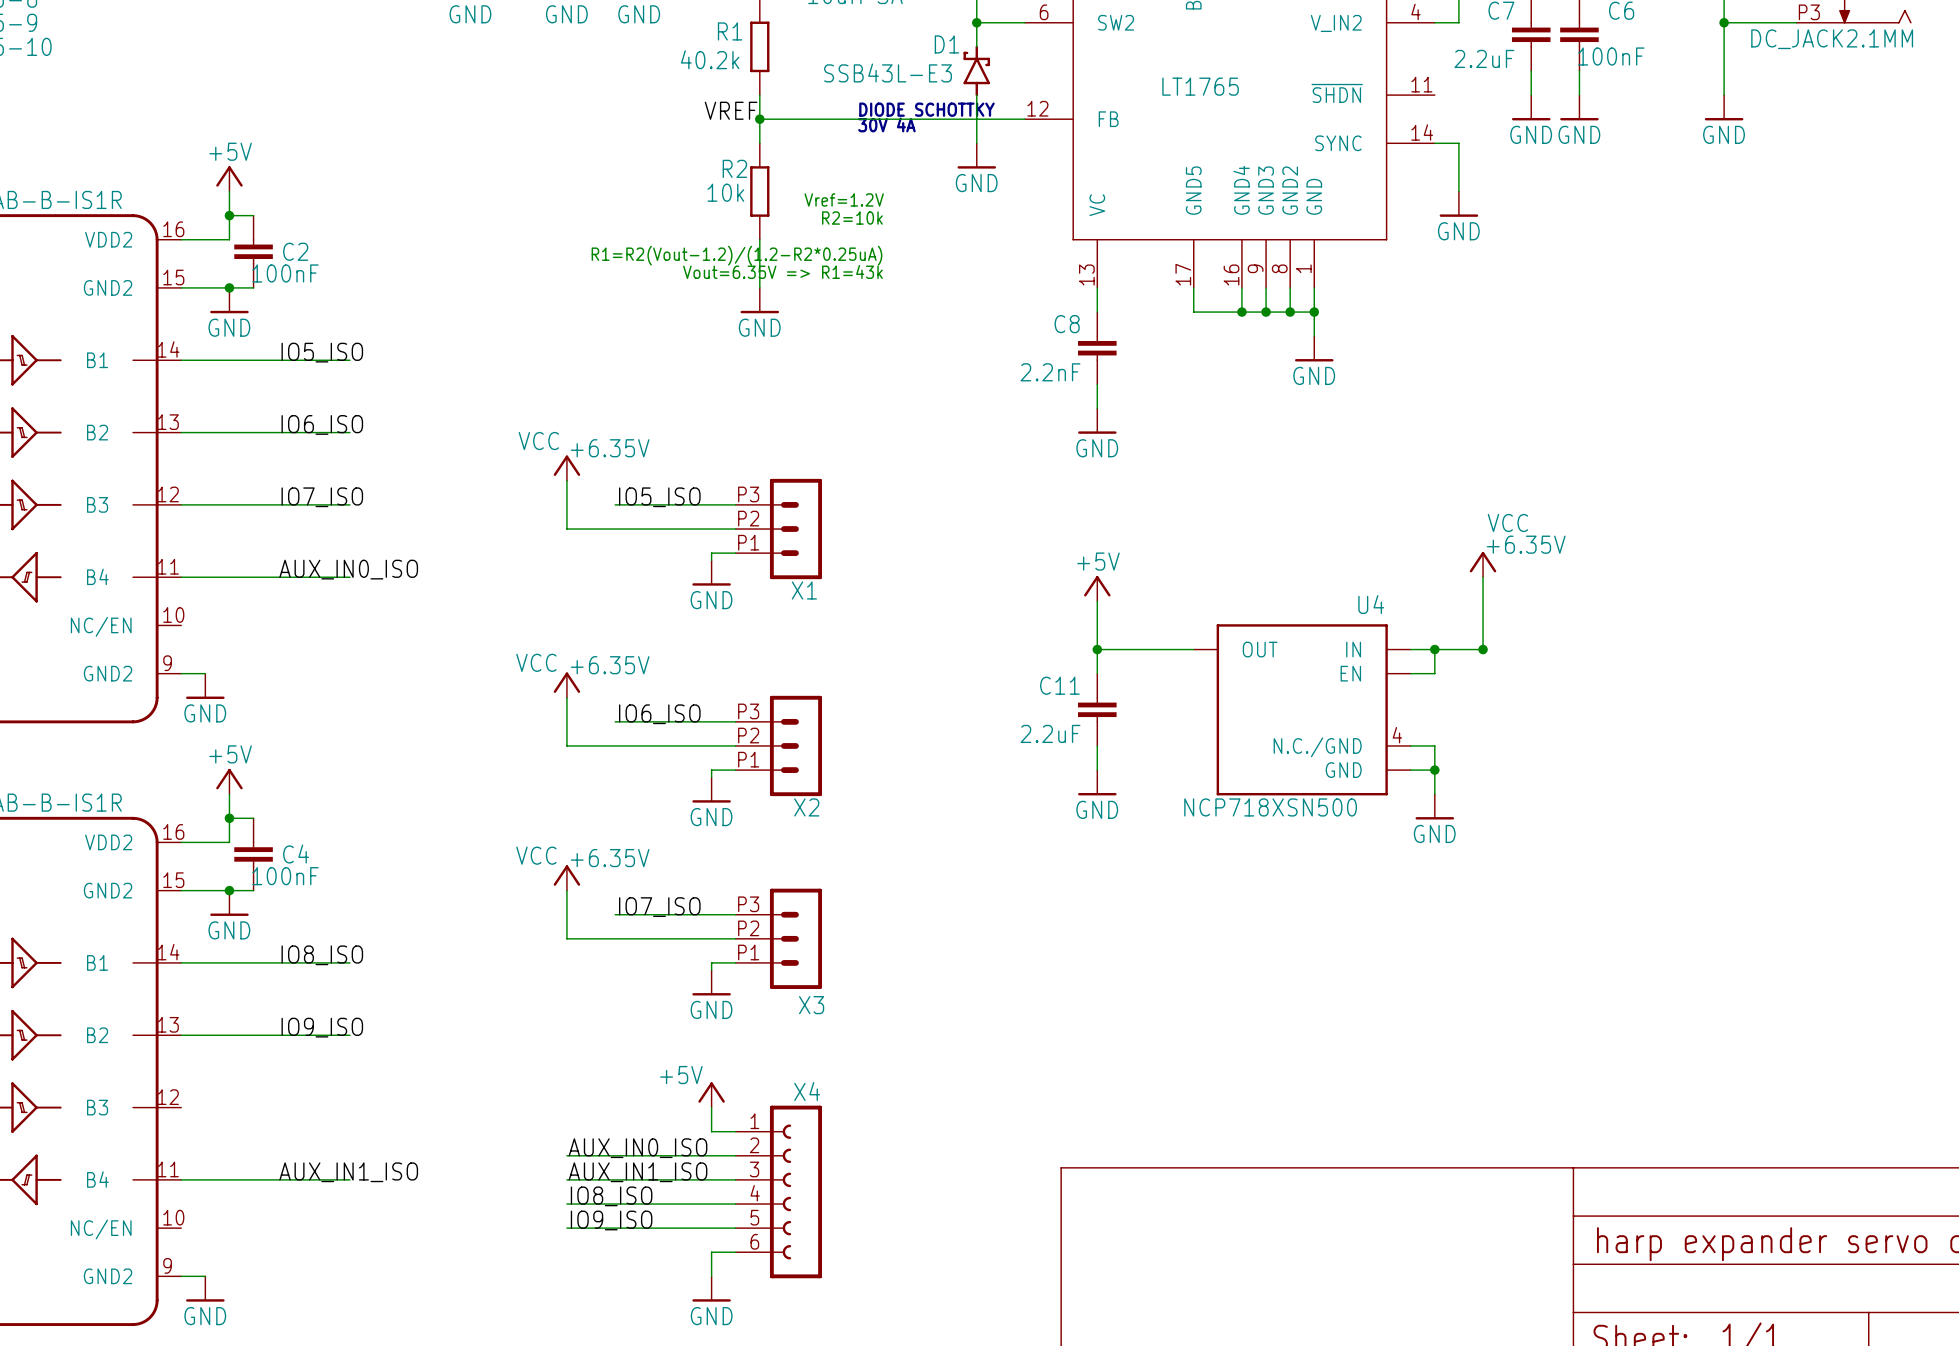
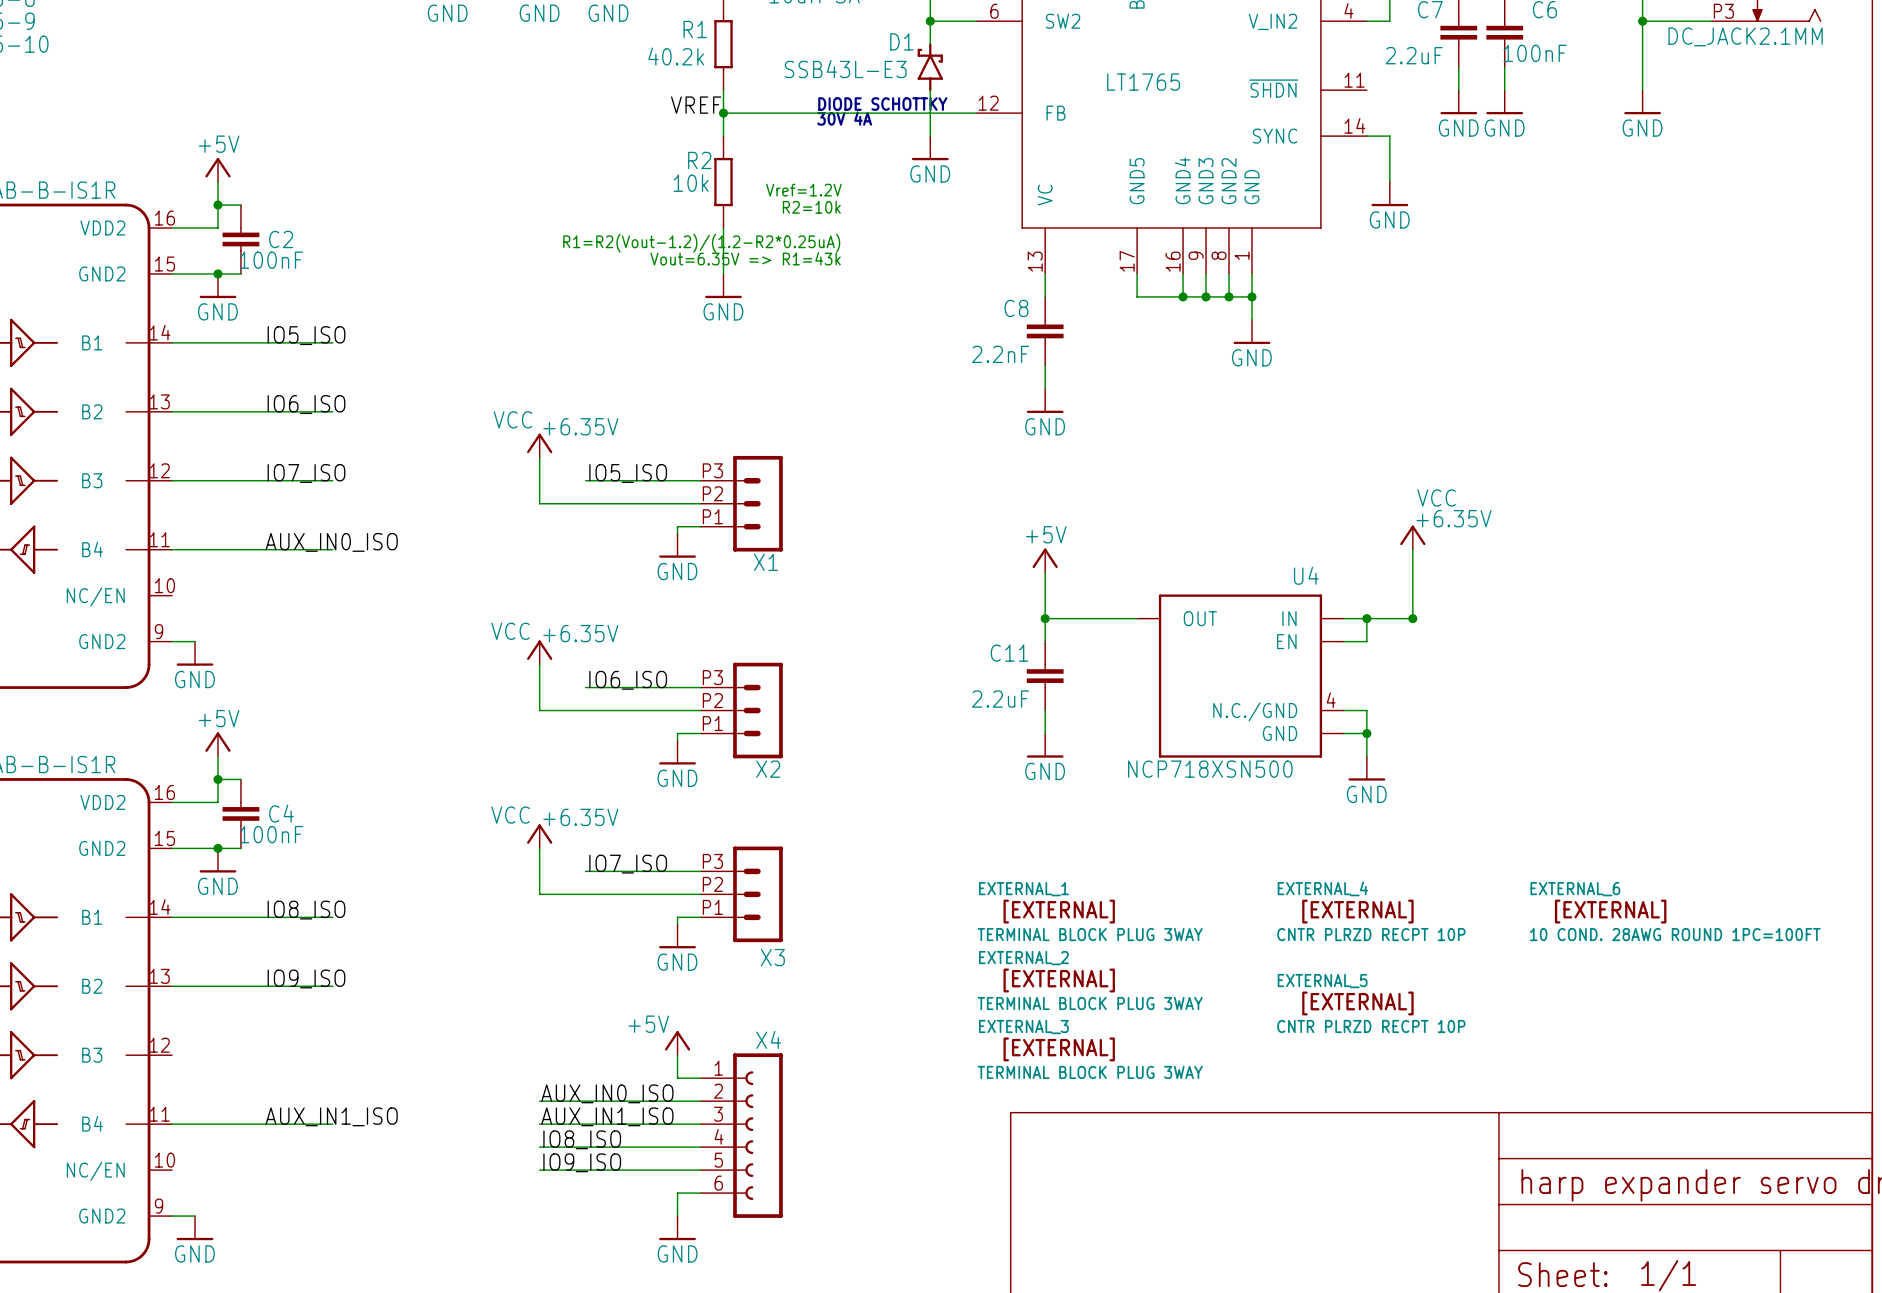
EXTERNAL_1: none -> TERMINAL BLOCK PLUG 3WAY (1090, 911)
EXTERNAL_4: none -> CNTR PLRZD RECPT 10P (1371, 911)
EXTERNAL_6: none -> 10 COND. 28AWG ROUND 1PC=100FT (1675, 911)
EXTERNAL_2: none -> TERMINAL BLOCK PLUG 3WAY (1090, 980)
EXTERNAL_5: none -> CNTR PLRZD RECPT 10P (1371, 1003)
EXTERNAL_3: none -> TERMINAL BLOCK PLUG 3WAY (1090, 1049)

